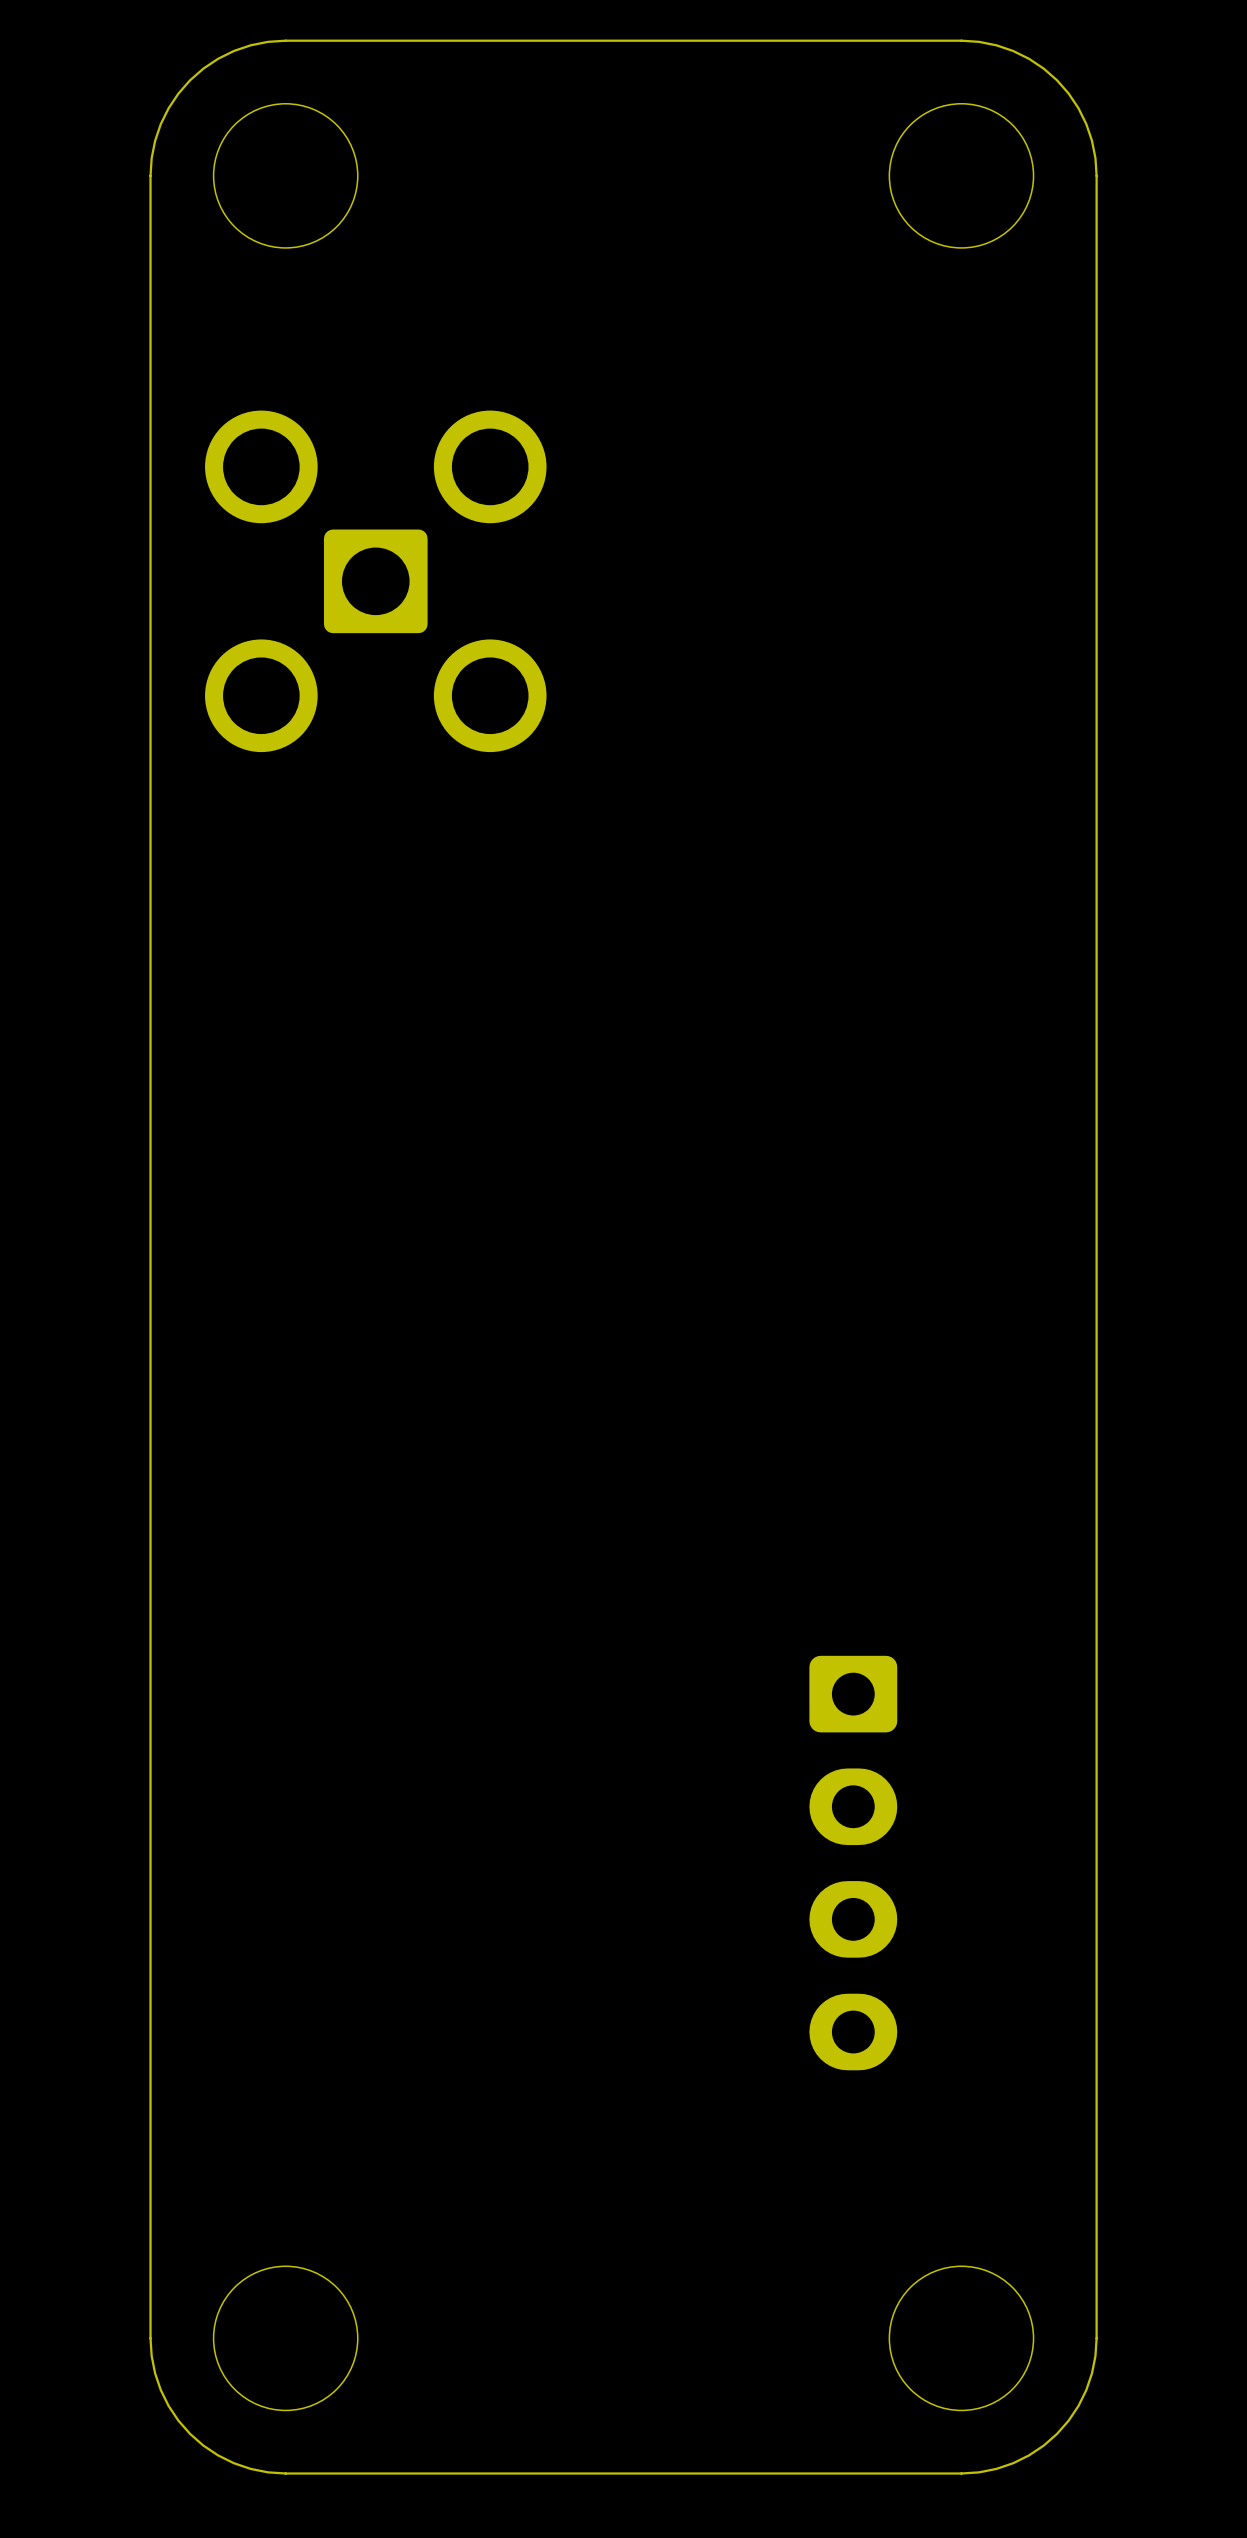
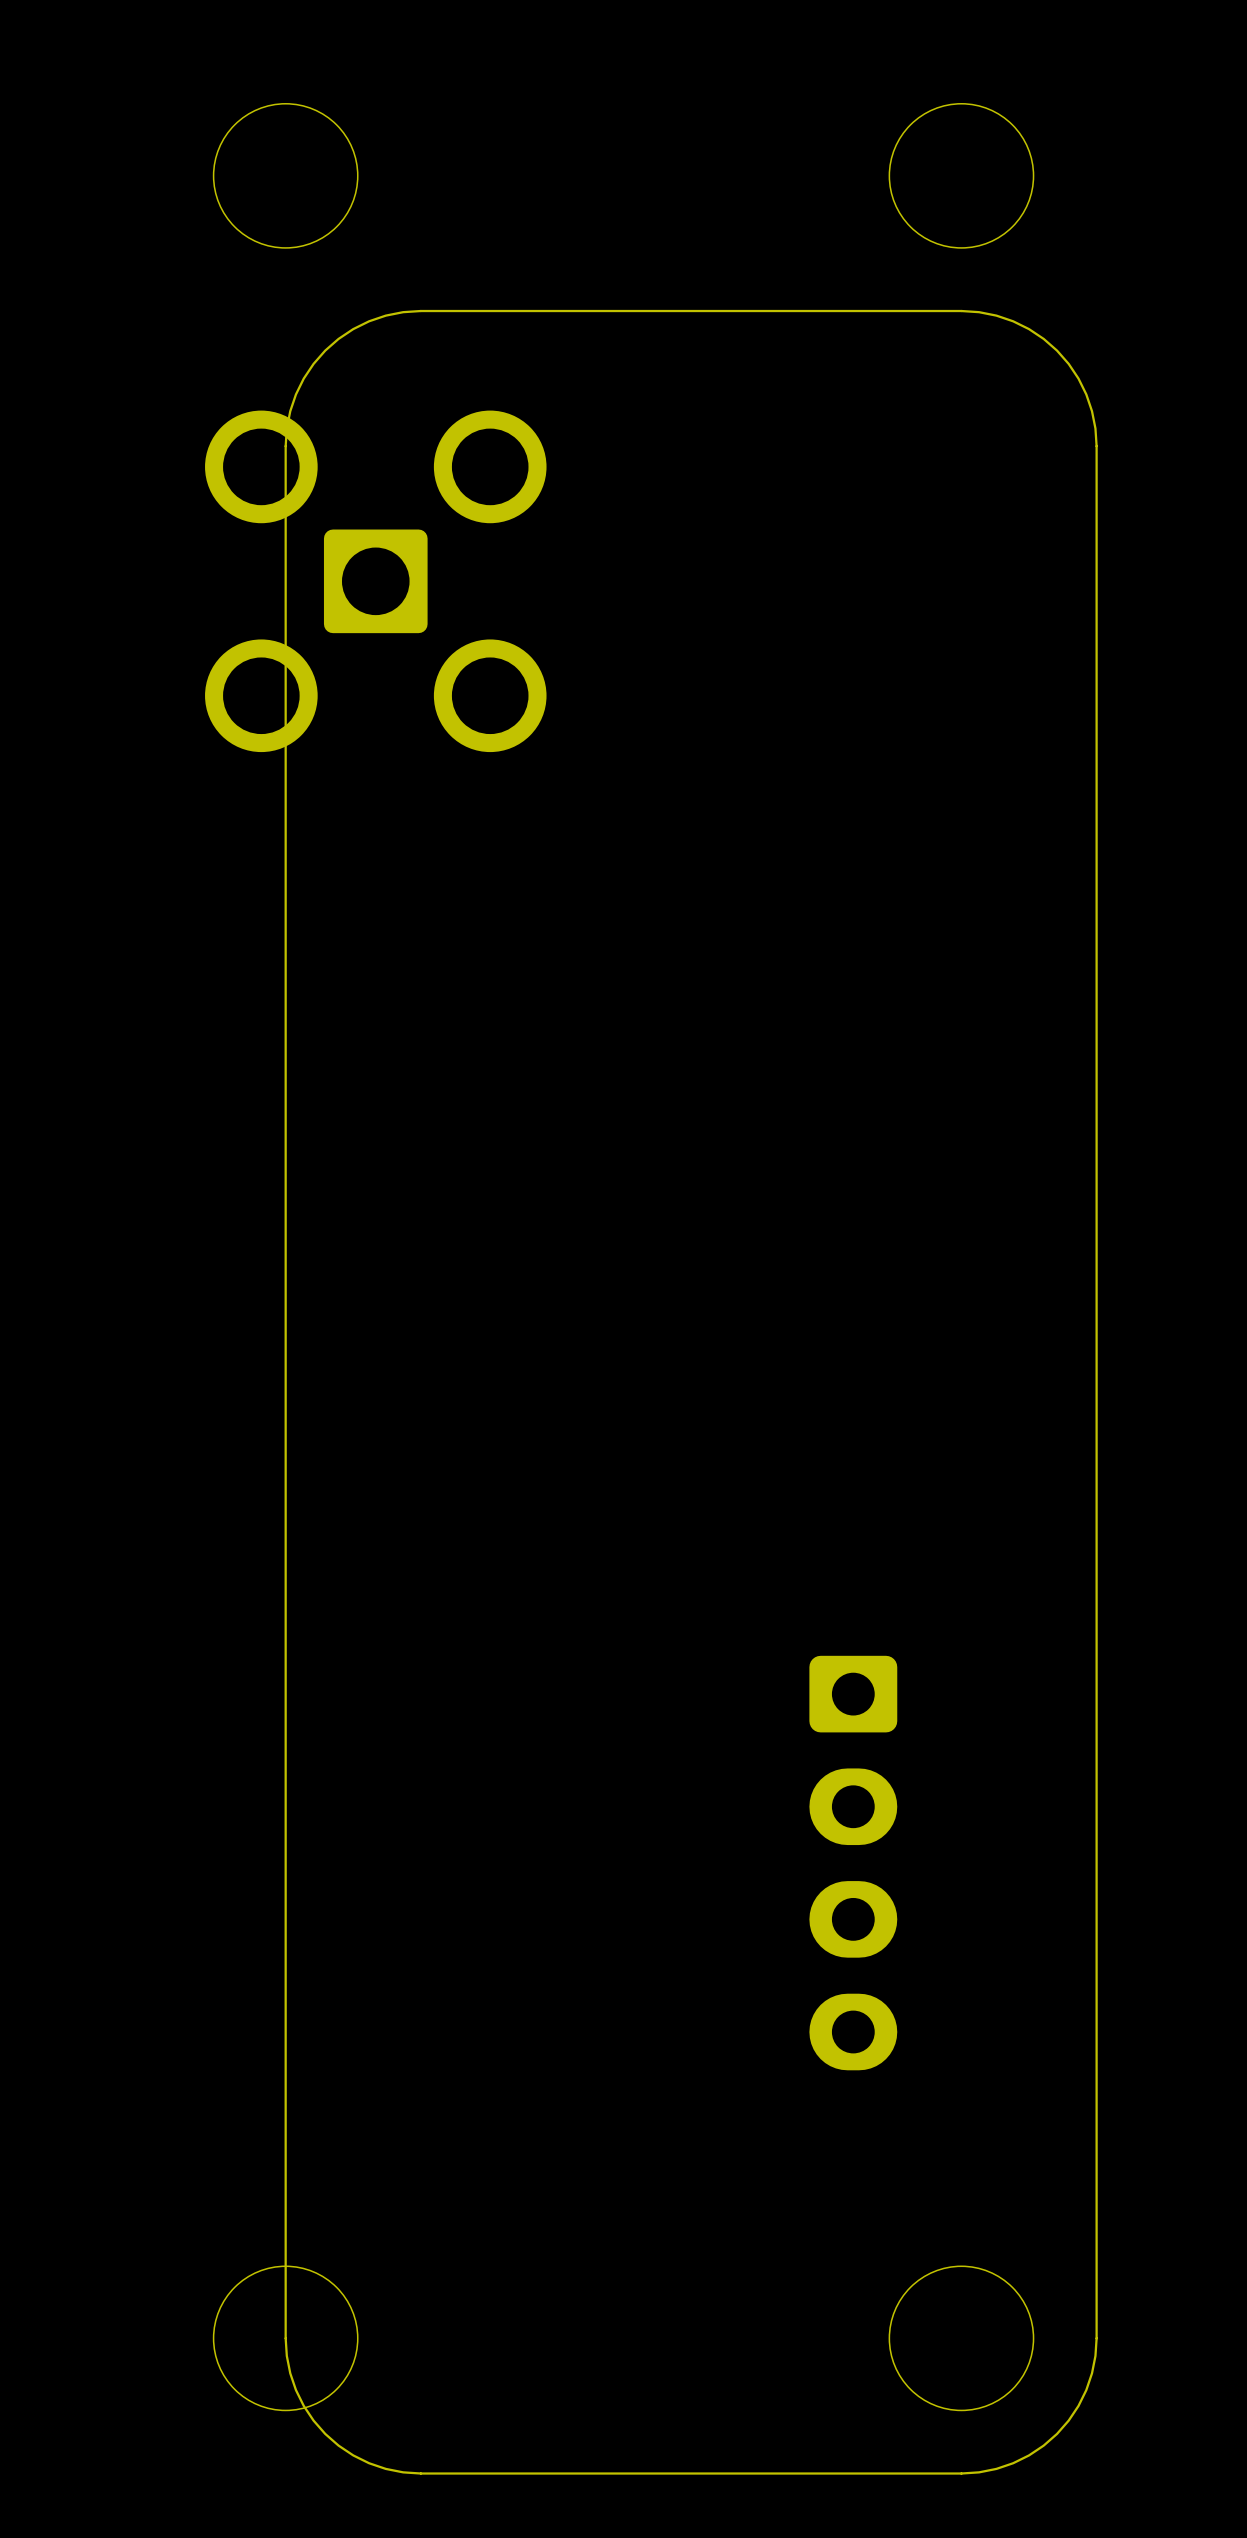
board edge: (1096, 446) (1096, 175) (1092, 140) (1078, 108) (1057, 80) (1029, 58) (996, 45) (961, 40) (268, 41) (233, 50) (203, 68) (178, 93) (168, 108) (155, 140) (150, 175) (151, 2356) (160, 2390) (178, 2420) (203, 2445) (233, 2463) (268, 2472) (285, 2473) (420, 2473) -> (1096, 446) (1095, 428) (1086, 394) (1068, 363) (1057, 350) (1043, 338) (1013, 321) (996, 315) (961, 311) (403, 312) (369, 321) (338, 338) (313, 363) (303, 378) (290, 411) (285, 446) (285, 2338) (290, 2373) (295, 2390) (313, 2420) (325, 2433) (353, 2455) (369, 2463) (403, 2472) (420, 2473)

